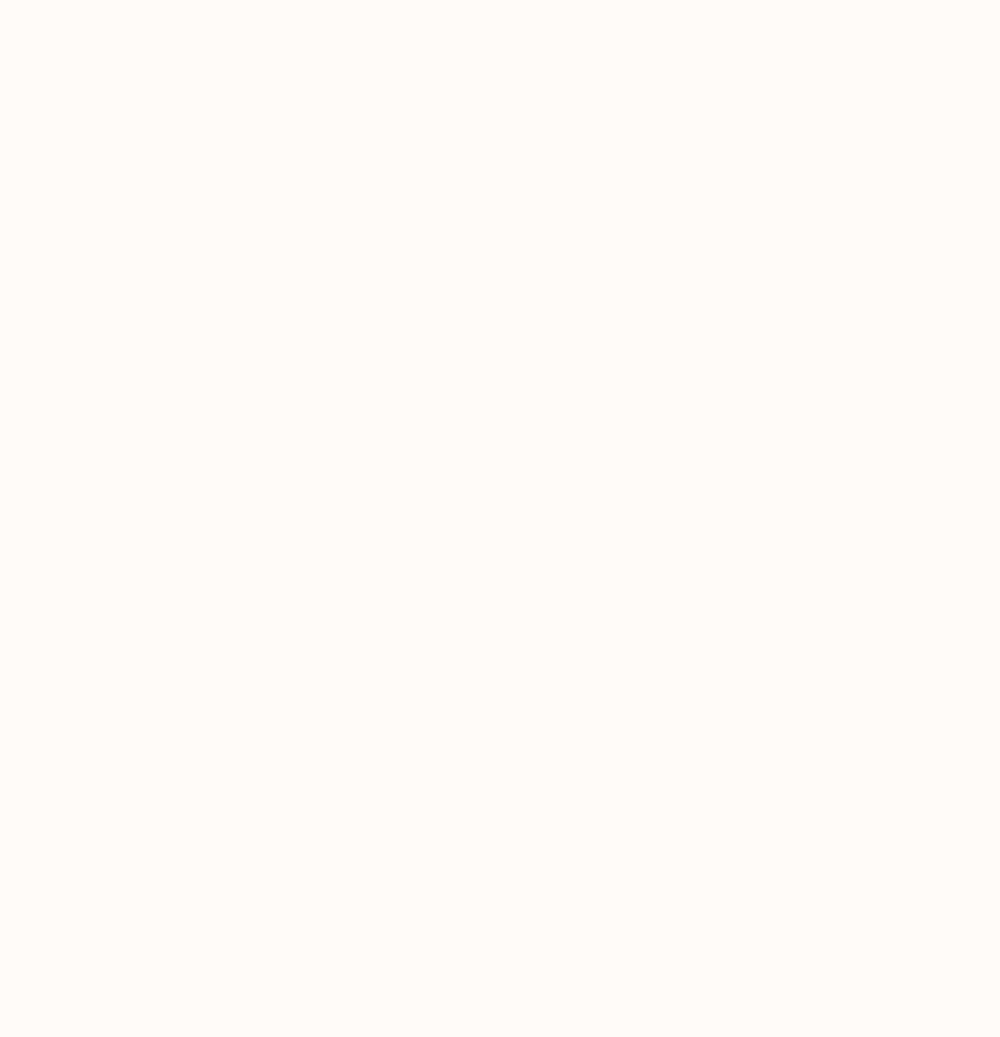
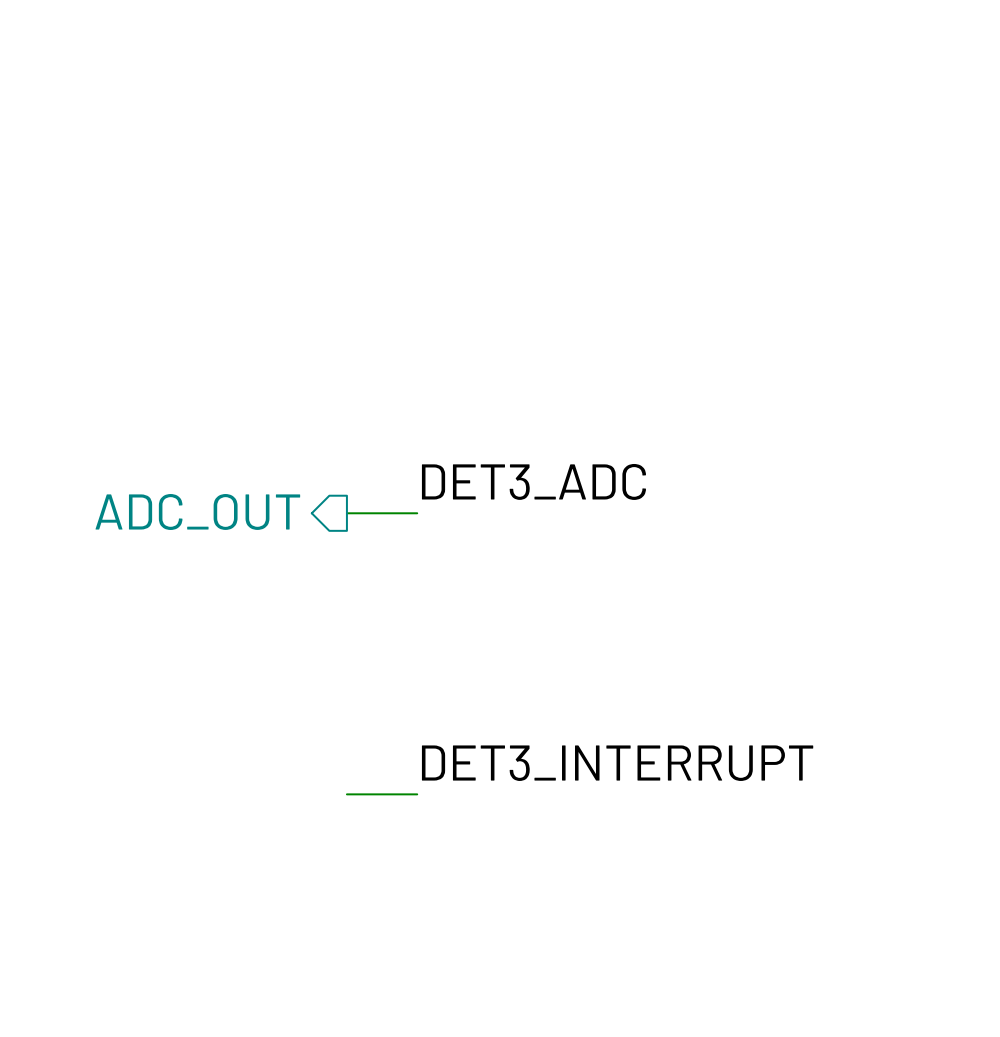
label: none -> DET3_ADC (533, 481)
sheet pin: none -> ADC_OUT (197, 511)
wire: none -> (346, 513) (417, 513)
label: none -> DET3_INTERRUPT (617, 763)
wire: none -> (346, 794) (417, 794)

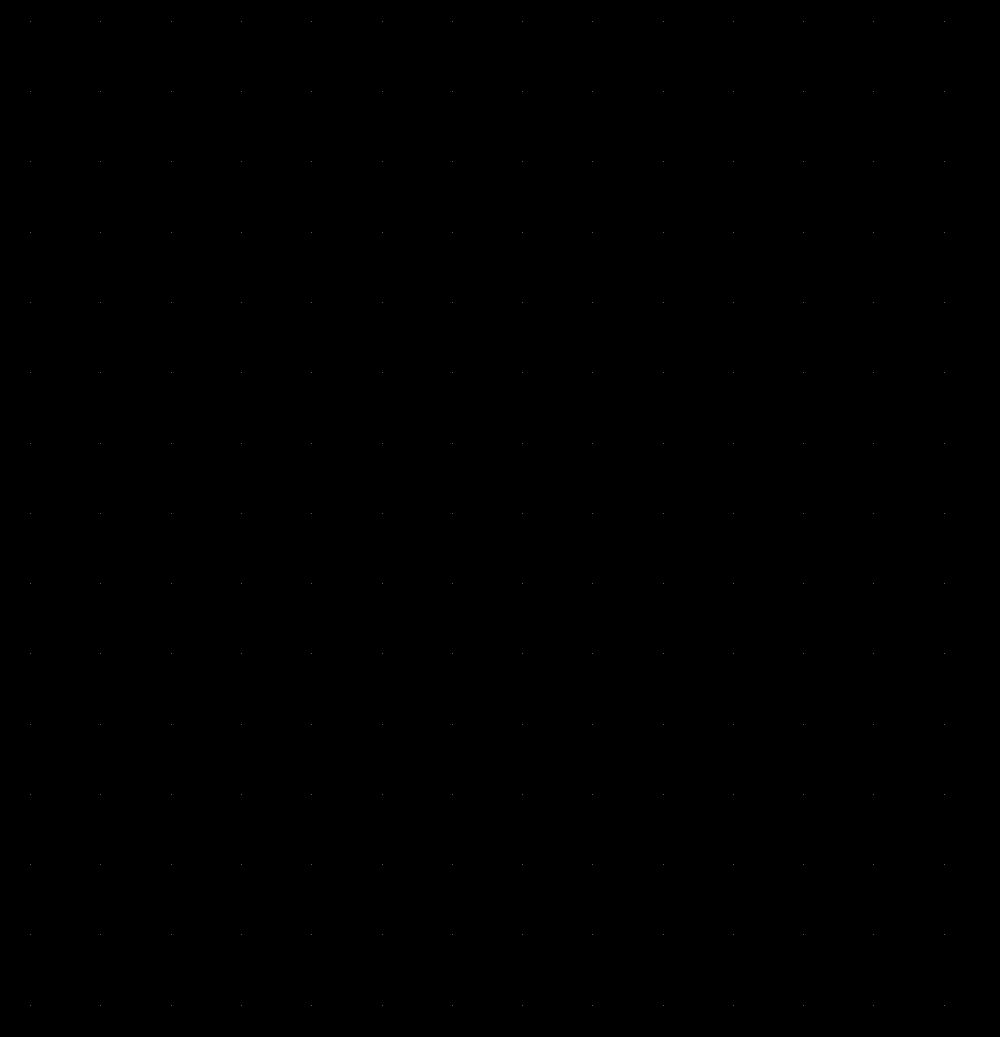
label: DET3_ADC (533, 481) -> none
sheet pin: ADC_OUT (197, 511) -> none
wire: (346, 513) (417, 513) -> none
label: DET3_INTERRUPT (617, 763) -> none
wire: (346, 794) (417, 794) -> none

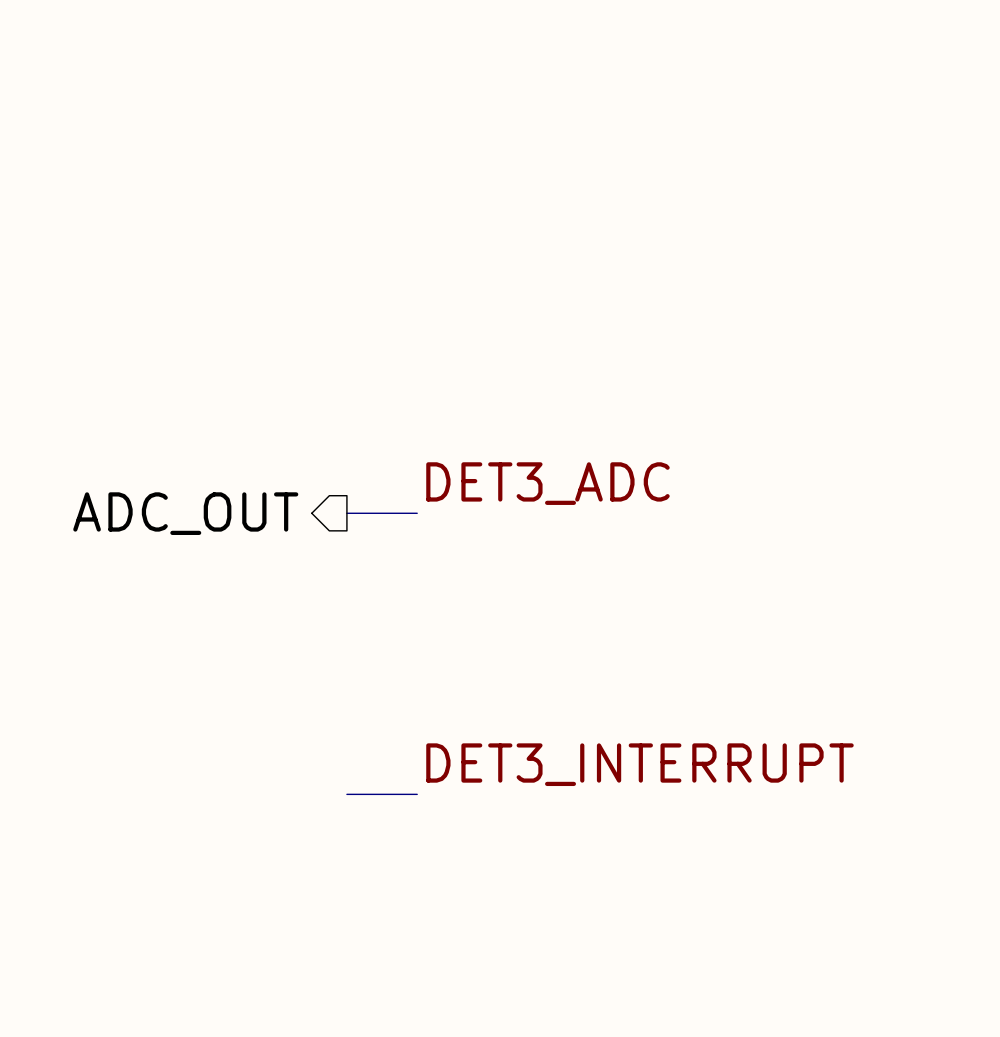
label: none -> DET3_ADC (547, 483)
sheet pin: none -> ADC_OUT (185, 513)
wire: none -> (346, 513) (417, 513)
label: none -> DET3_INTERRUPT (639, 764)
wire: none -> (346, 794) (417, 794)

